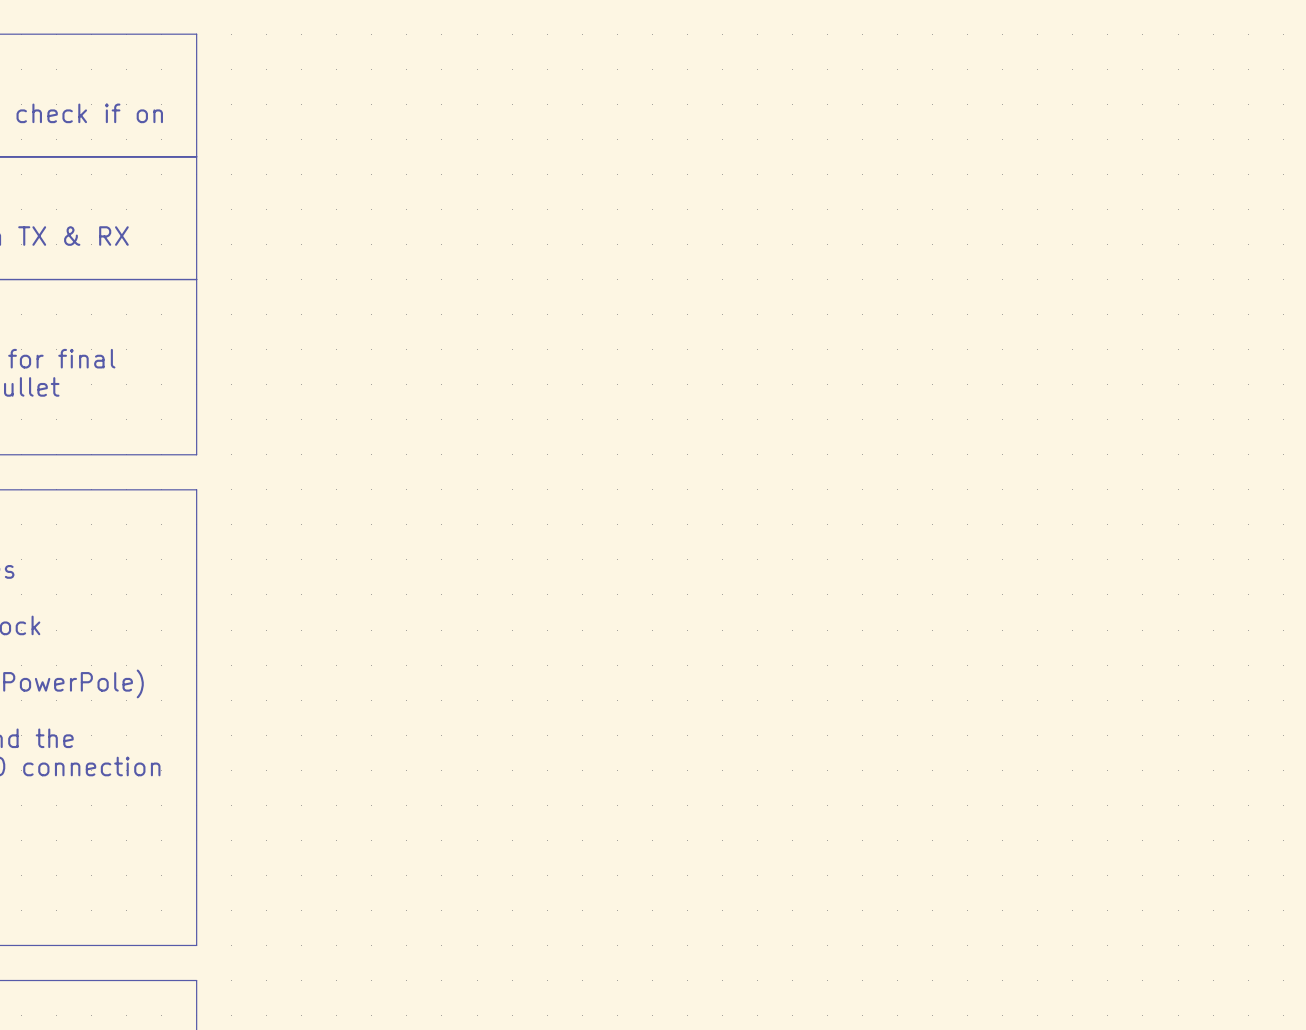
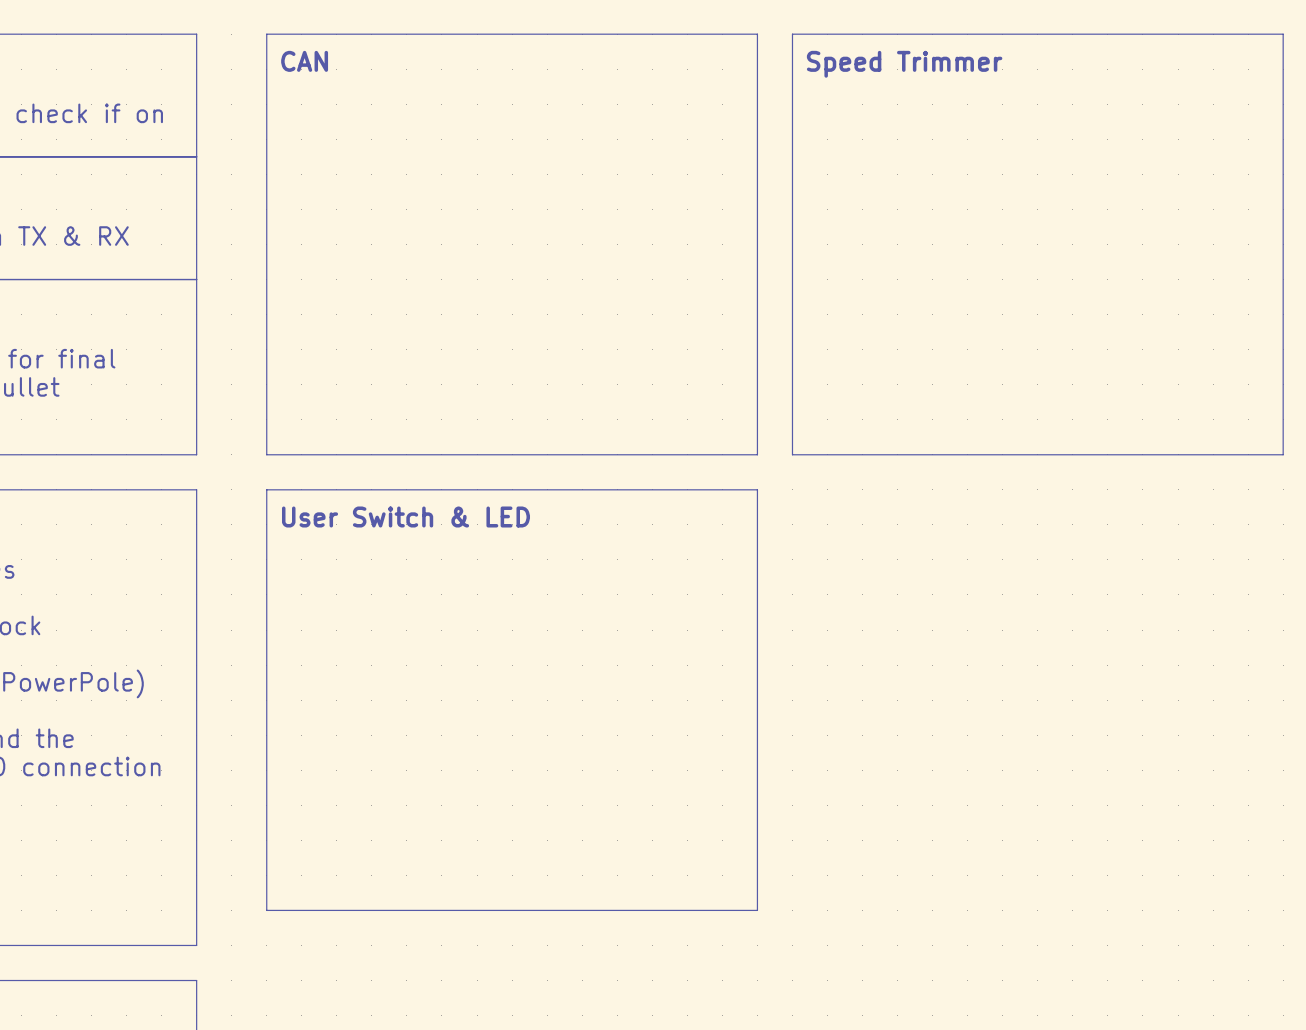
line: none -> (266, 34) (757, 34) (757, 454) (266, 454) (266, 34)
line: none -> (792, 34) (1283, 34) (1283, 454) (792, 454) (792, 34)
text: none -> CAN (304, 61)
text: none -> Speed Trimmer (904, 64)
line: none -> (266, 489) (757, 489) (757, 910) (266, 910) (266, 489)
text: none -> User Switch & LED (405, 517)

